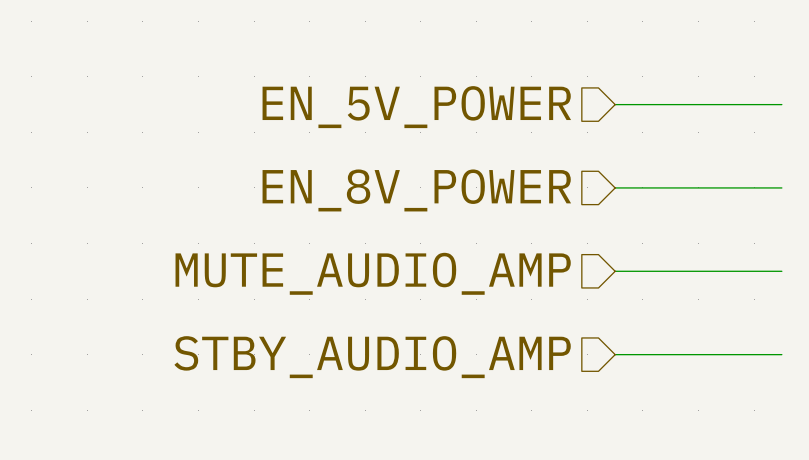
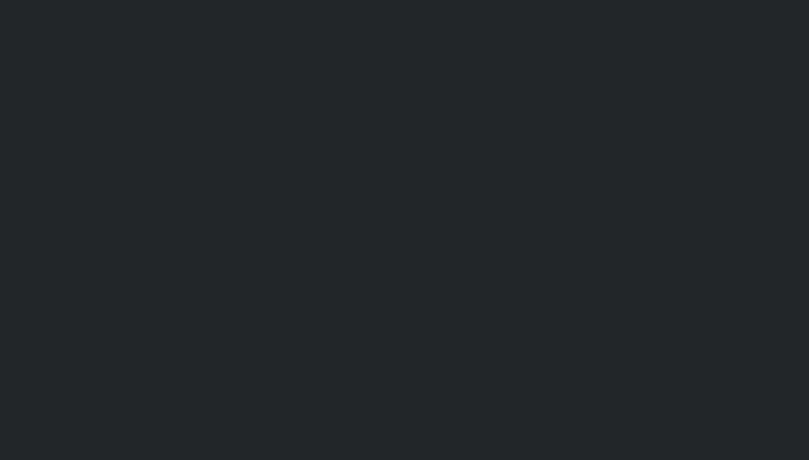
wire: (615, 104) (781, 104) -> none
hierarchical label: EN_5V_POWER (416, 107) -> none
wire: (615, 187) (781, 187) -> none
hierarchical label: EN_8V_POWER (416, 190) -> none
wire: (615, 271) (781, 271) -> none
hierarchical label: MUTE_AUDIO_AMP (373, 273) -> none
wire: (615, 354) (781, 354) -> none
hierarchical label: STBY_AUDIO_AMP (372, 357) -> none

